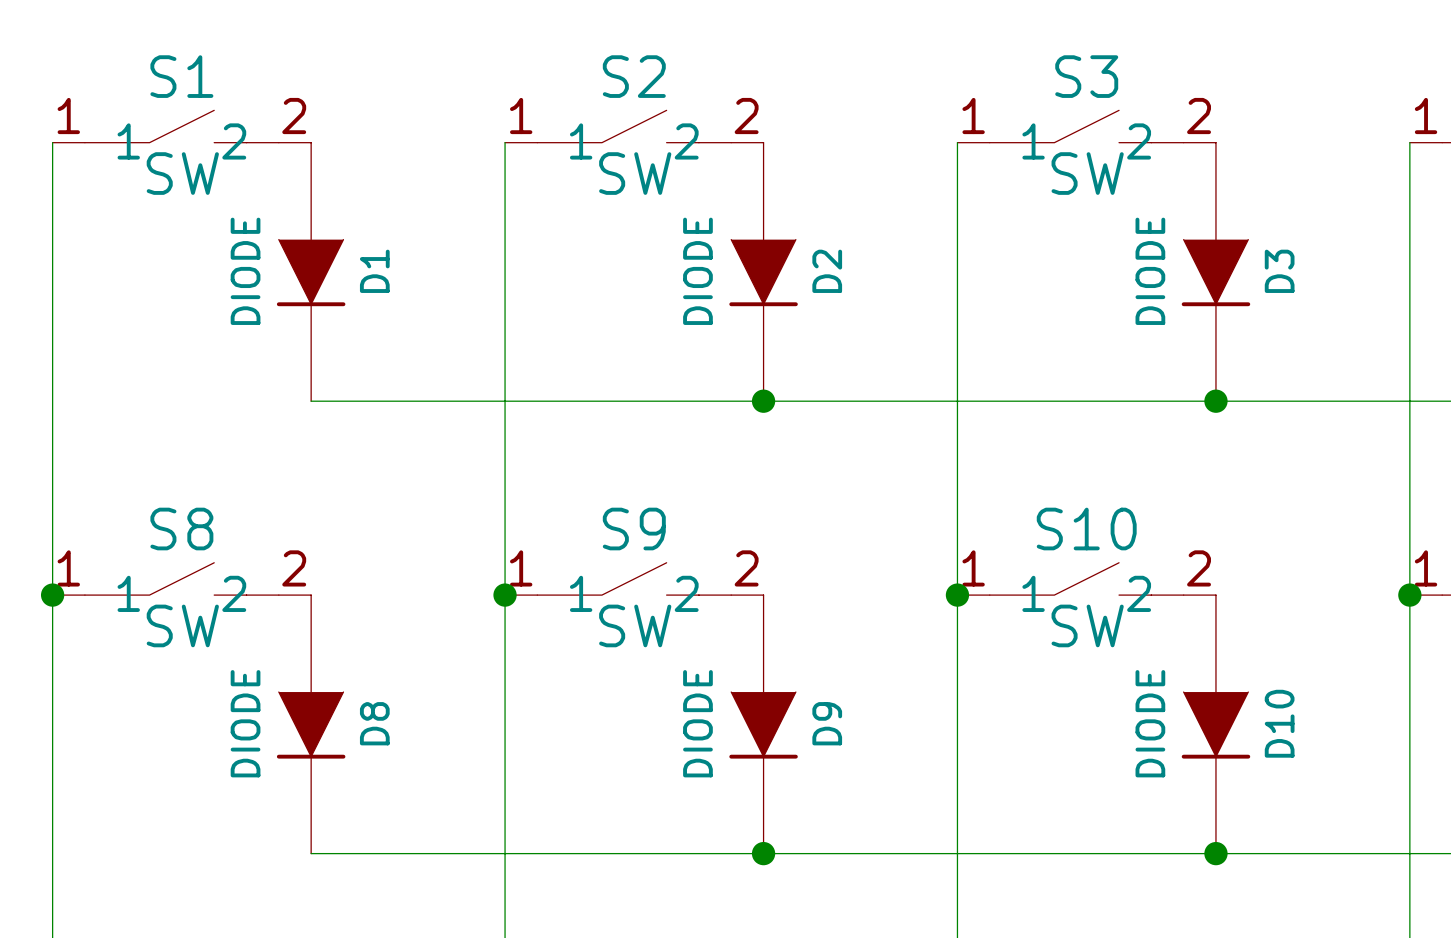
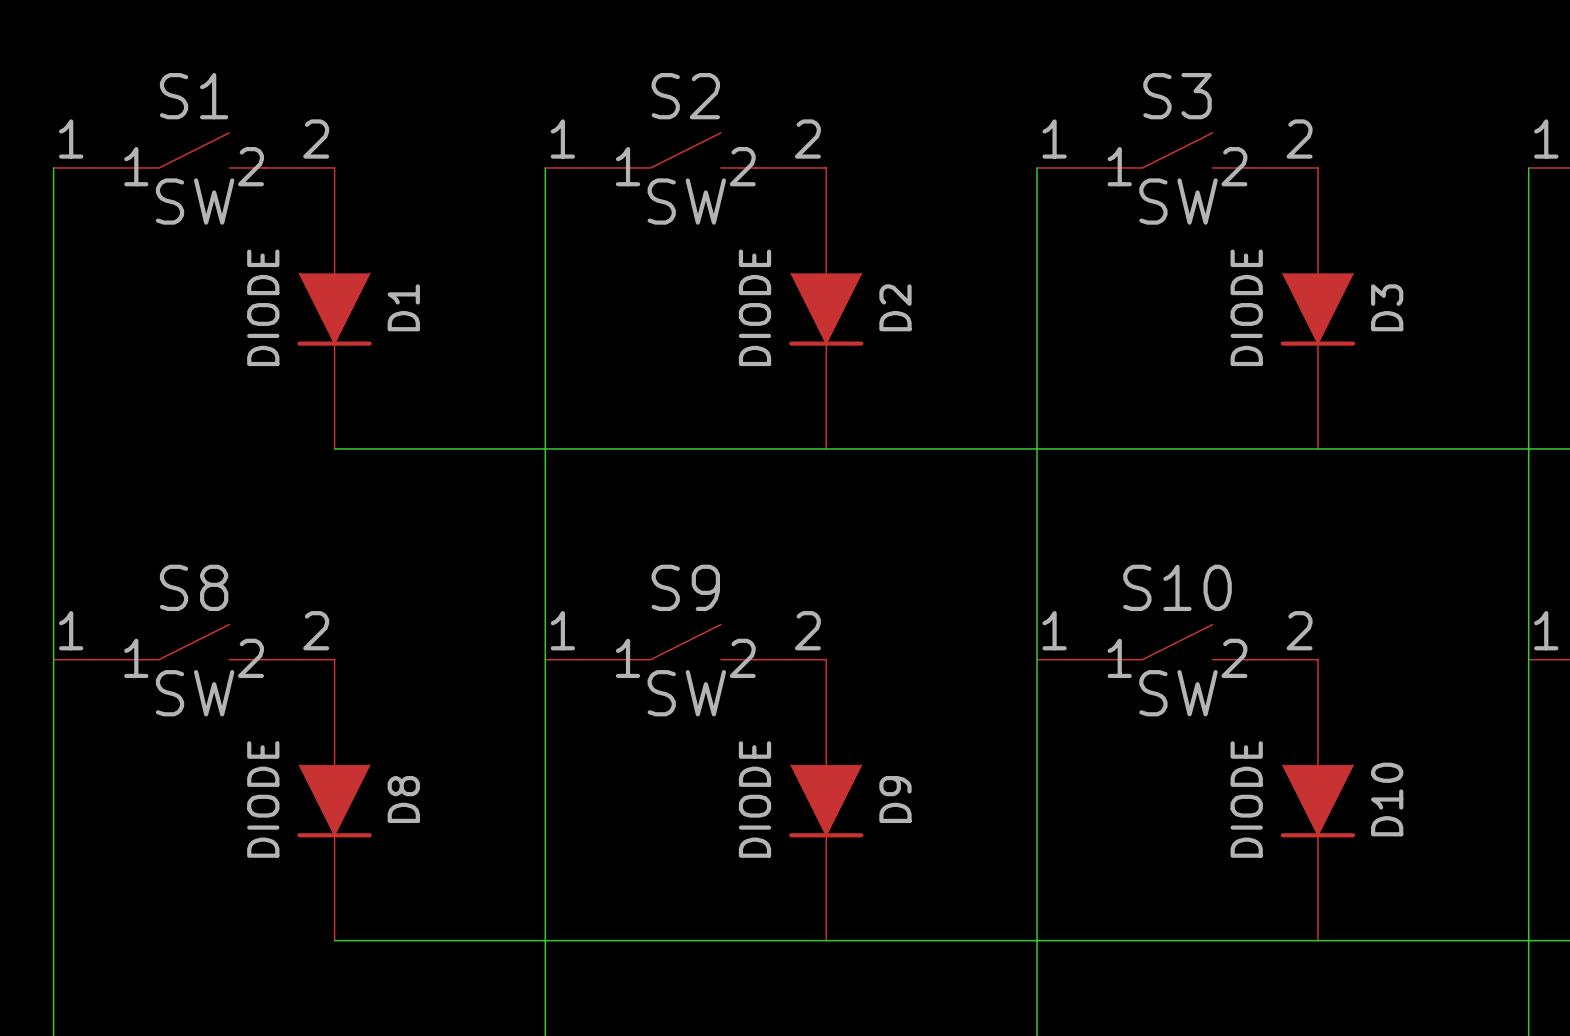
junction: (763, 401) -> none
junction: (1215, 401) -> none
junction: (52, 595) -> none
junction: (505, 595) -> none
junction: (957, 595) -> none
junction: (1409, 595) -> none
junction: (763, 853) -> none
junction: (1215, 853) -> none

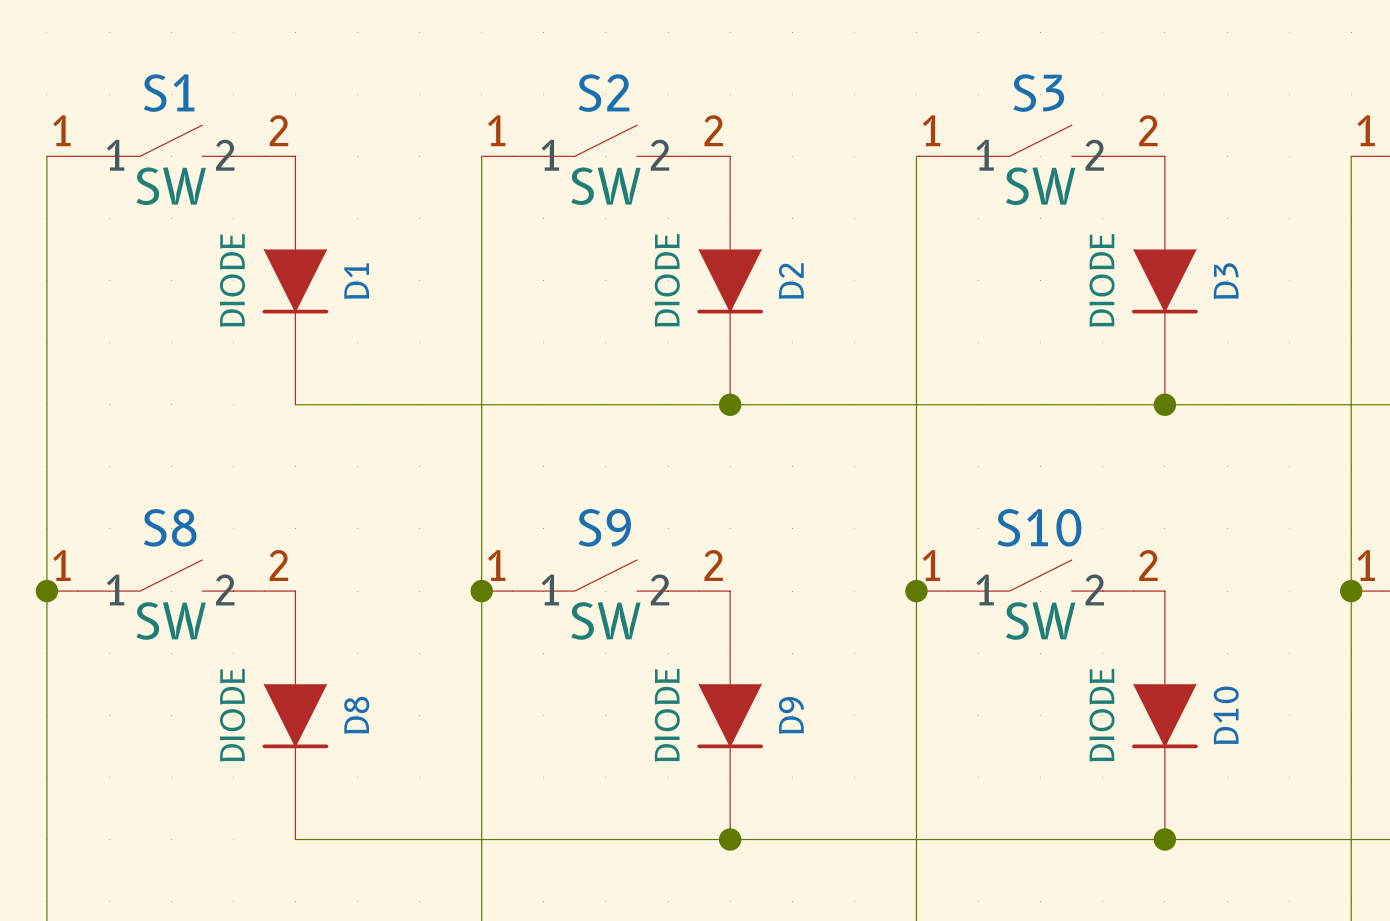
junction: none -> (730, 404)
junction: none -> (1164, 404)
junction: none -> (46, 591)
junction: none -> (481, 591)
junction: none -> (916, 591)
junction: none -> (1351, 591)
junction: none -> (730, 839)
junction: none -> (1164, 839)

